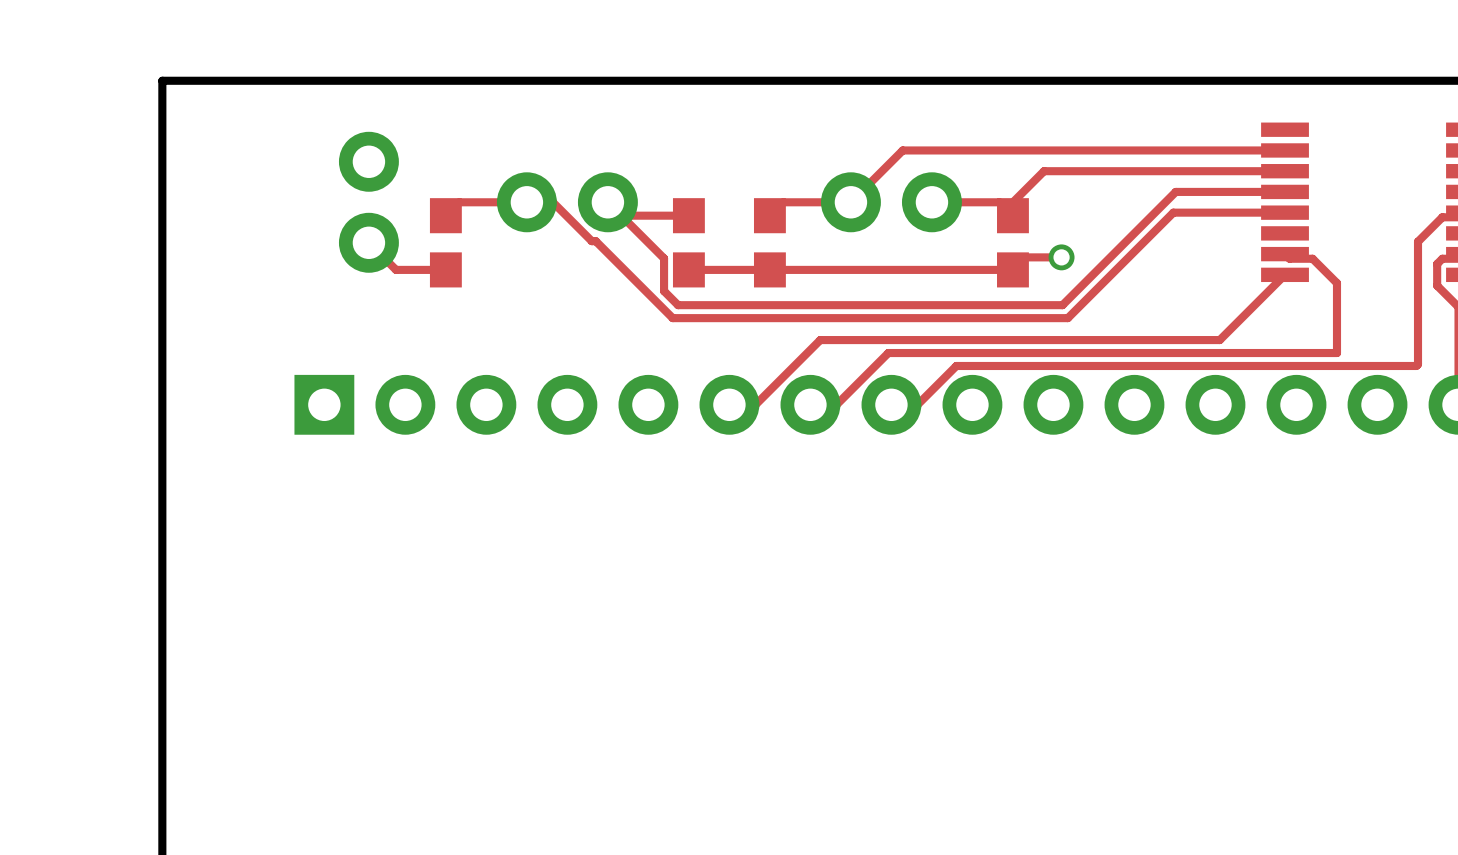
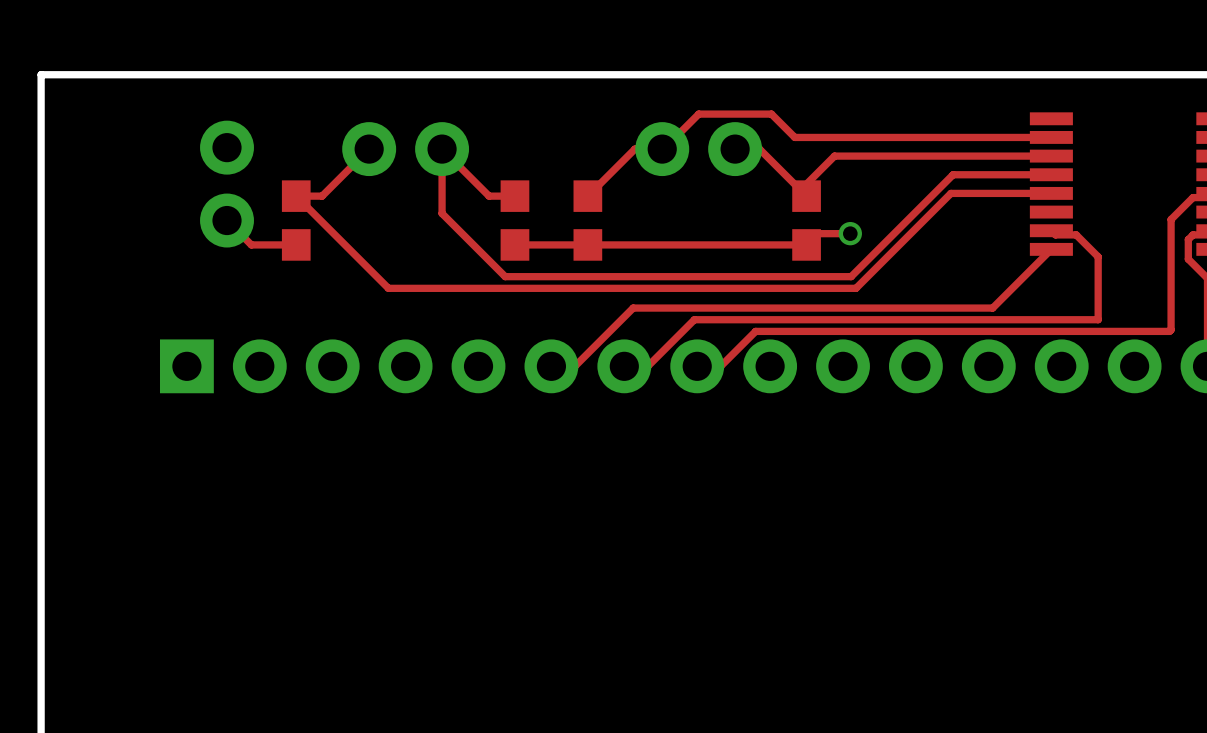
top track: (999, 150) (902, 150) (850, 202) (783, 202) -> (794, 137) (771, 114) (698, 114) (663, 149) (634, 149) (599, 184)
part position: (567, 202) -> (405, 149)
top track: (607, 202) (664, 258) (664, 291) -> (489, 196) (442, 149) (442, 213) (492, 264)
part position: (891, 202) -> (698, 149)
top track: (999, 202) (931, 202) -> (794, 184) (759, 149) (735, 149)
top track: (445, 215) (459, 202) (552, 202) (591, 241) (595, 241) (672, 318) -> (369, 149) (322, 196) (296, 196) (388, 288) (500, 288)
top track: (660, 215) (621, 215) -> none

